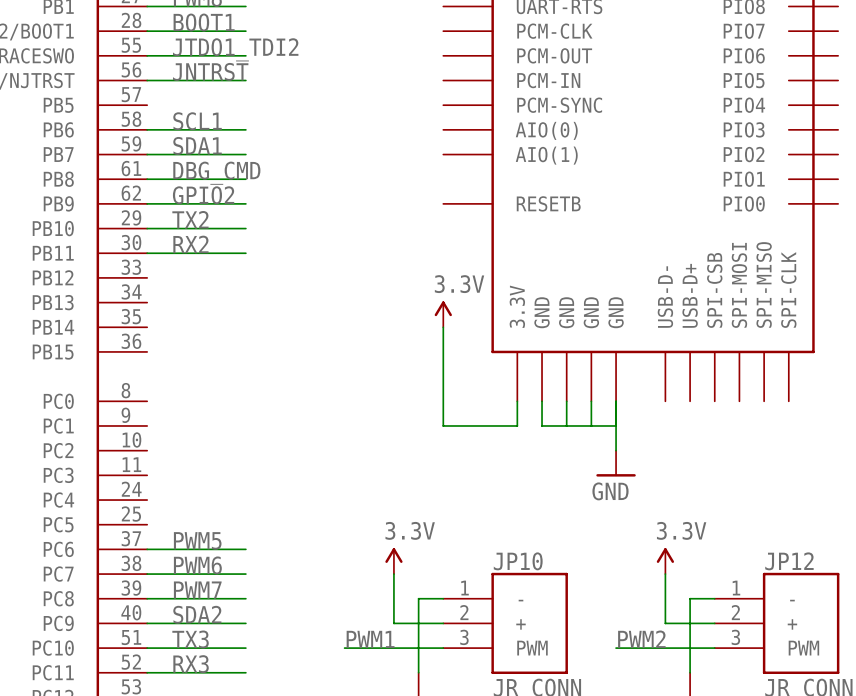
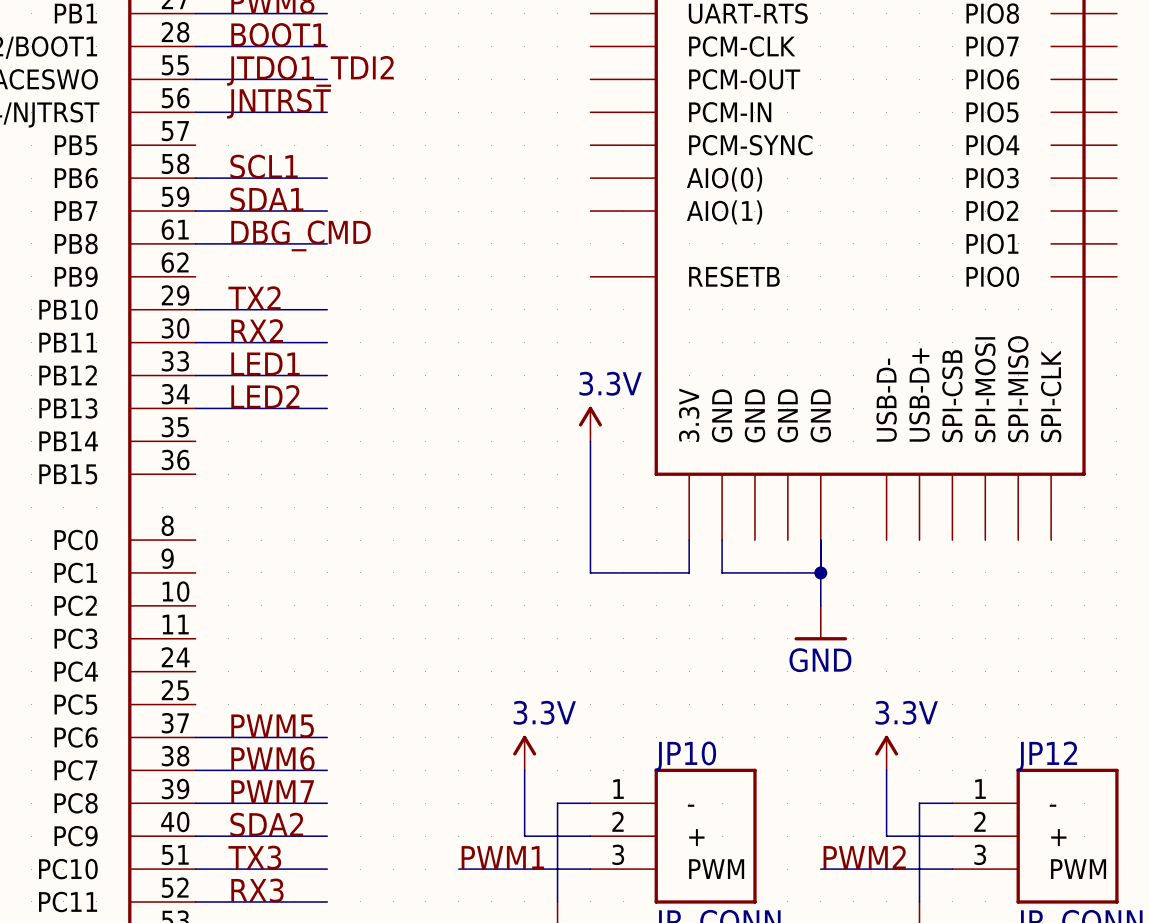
label: GPIO2 (203, 195) -> none
wire: (147, 203) (245, 203) -> (195, 375) (327, 375)
label: none -> LED1 (265, 364)
label: none -> LED2 (265, 396)
wire: none -> (195, 408) (327, 408)
wire: (566, 401) (566, 425) -> none
wire: (591, 401) (591, 425) -> none
junction: none -> (820, 572)

